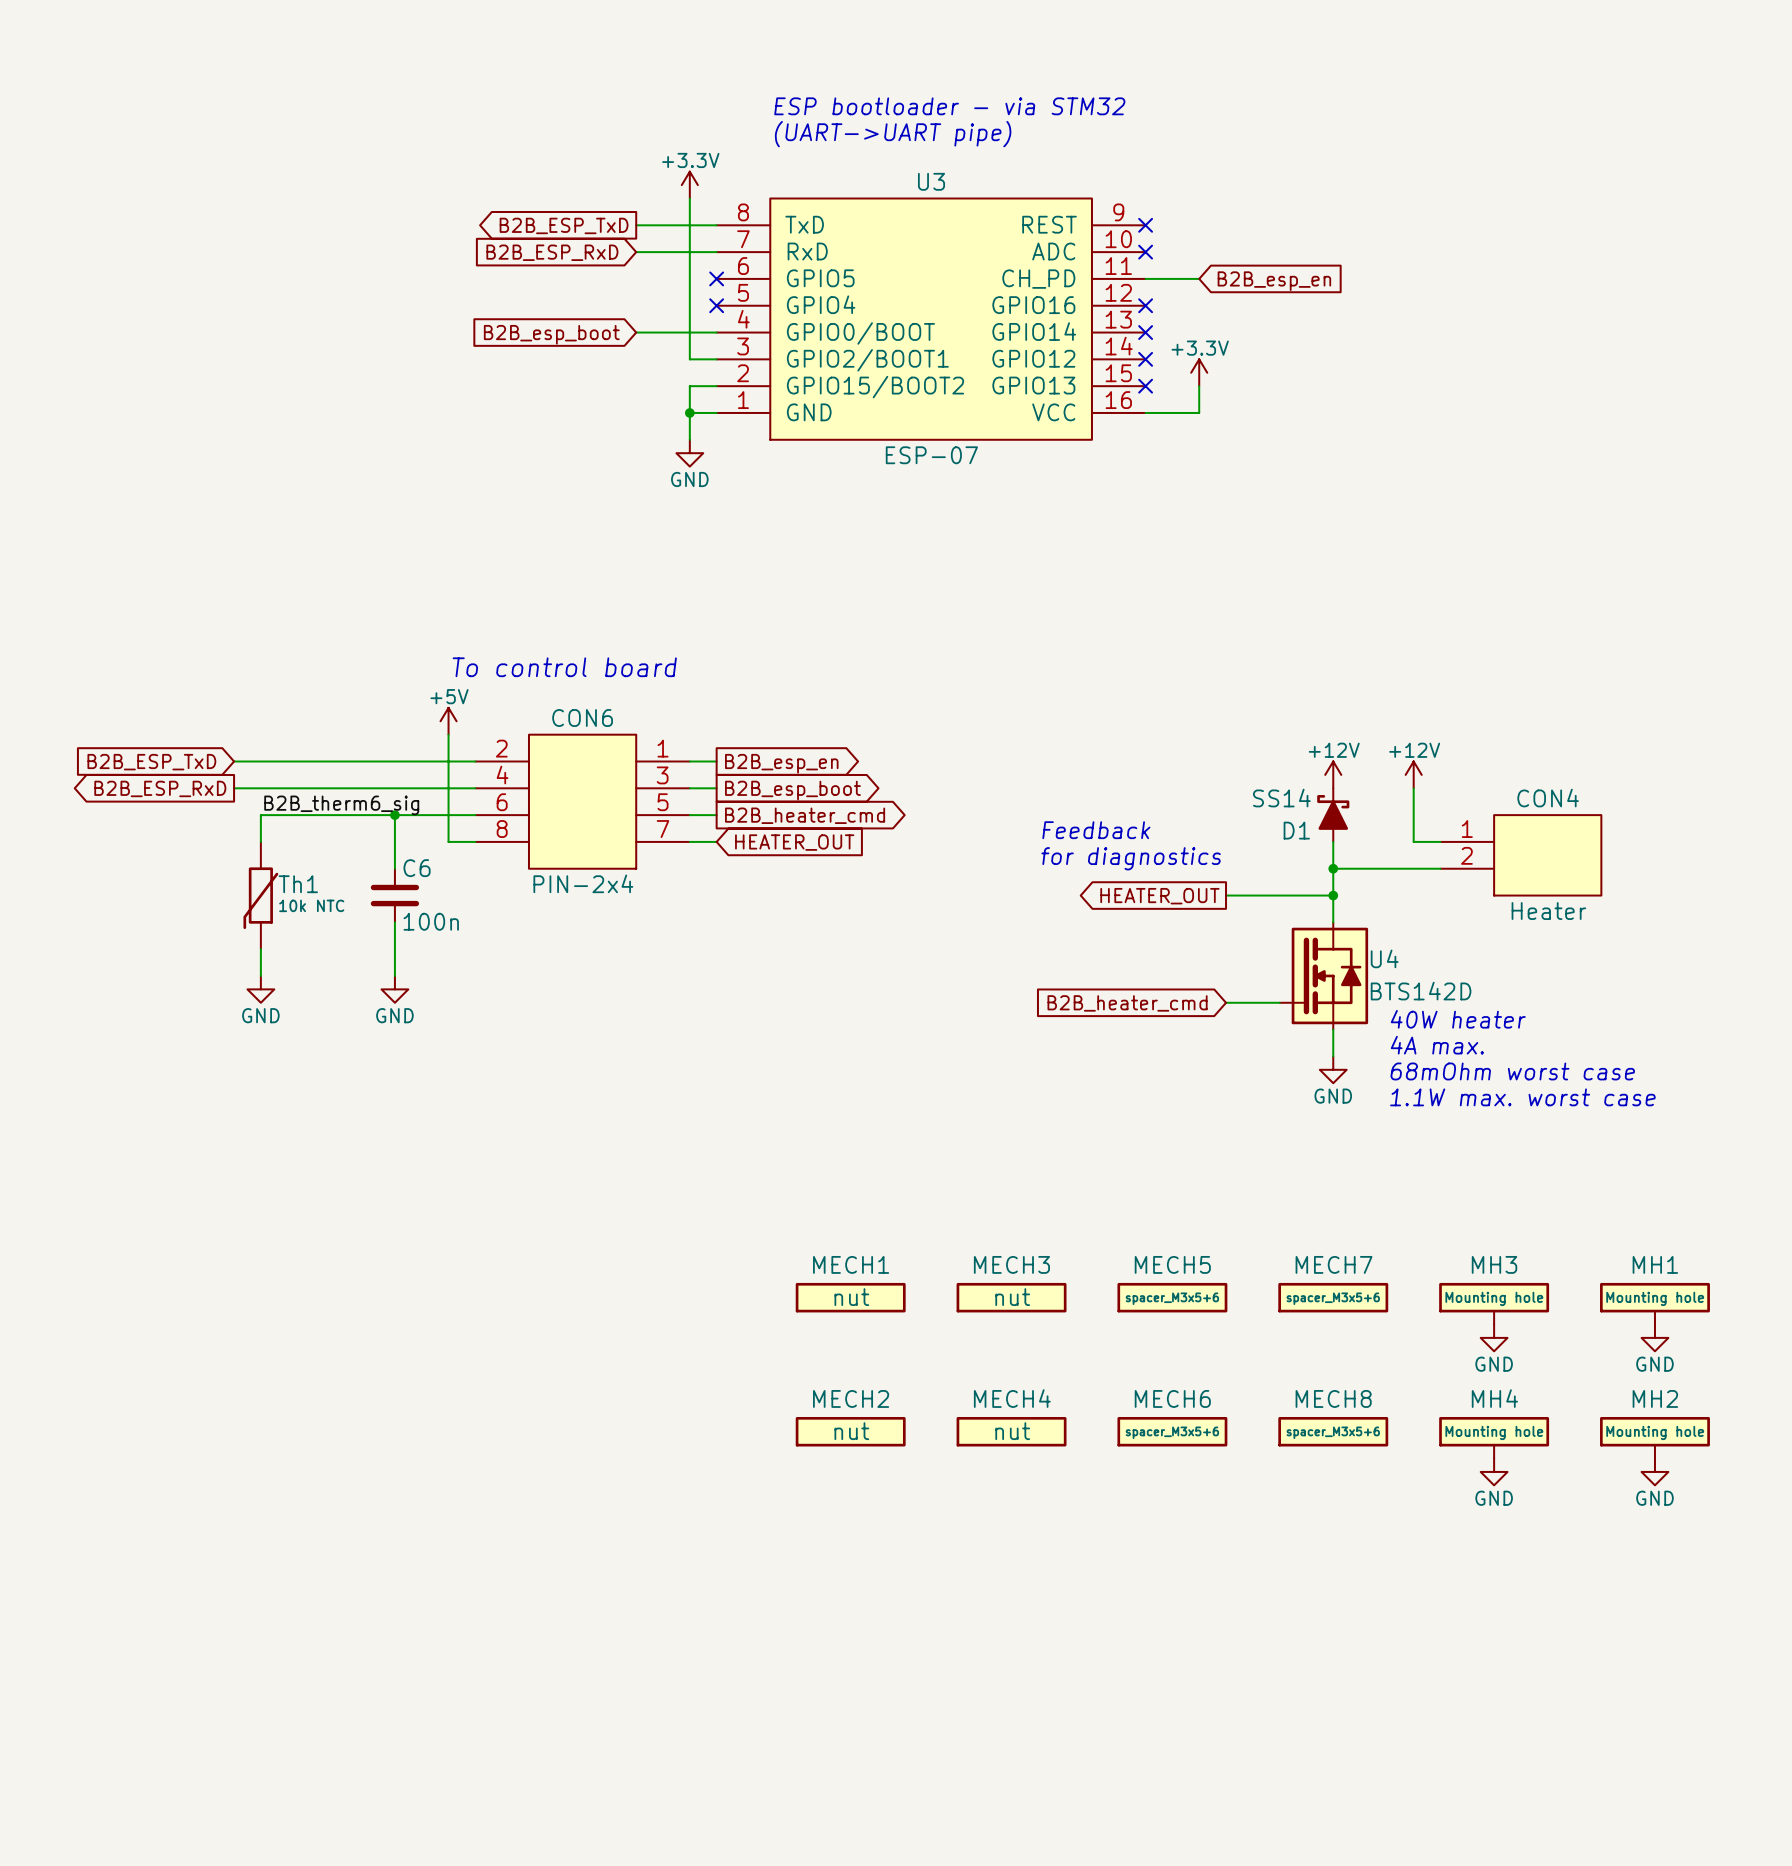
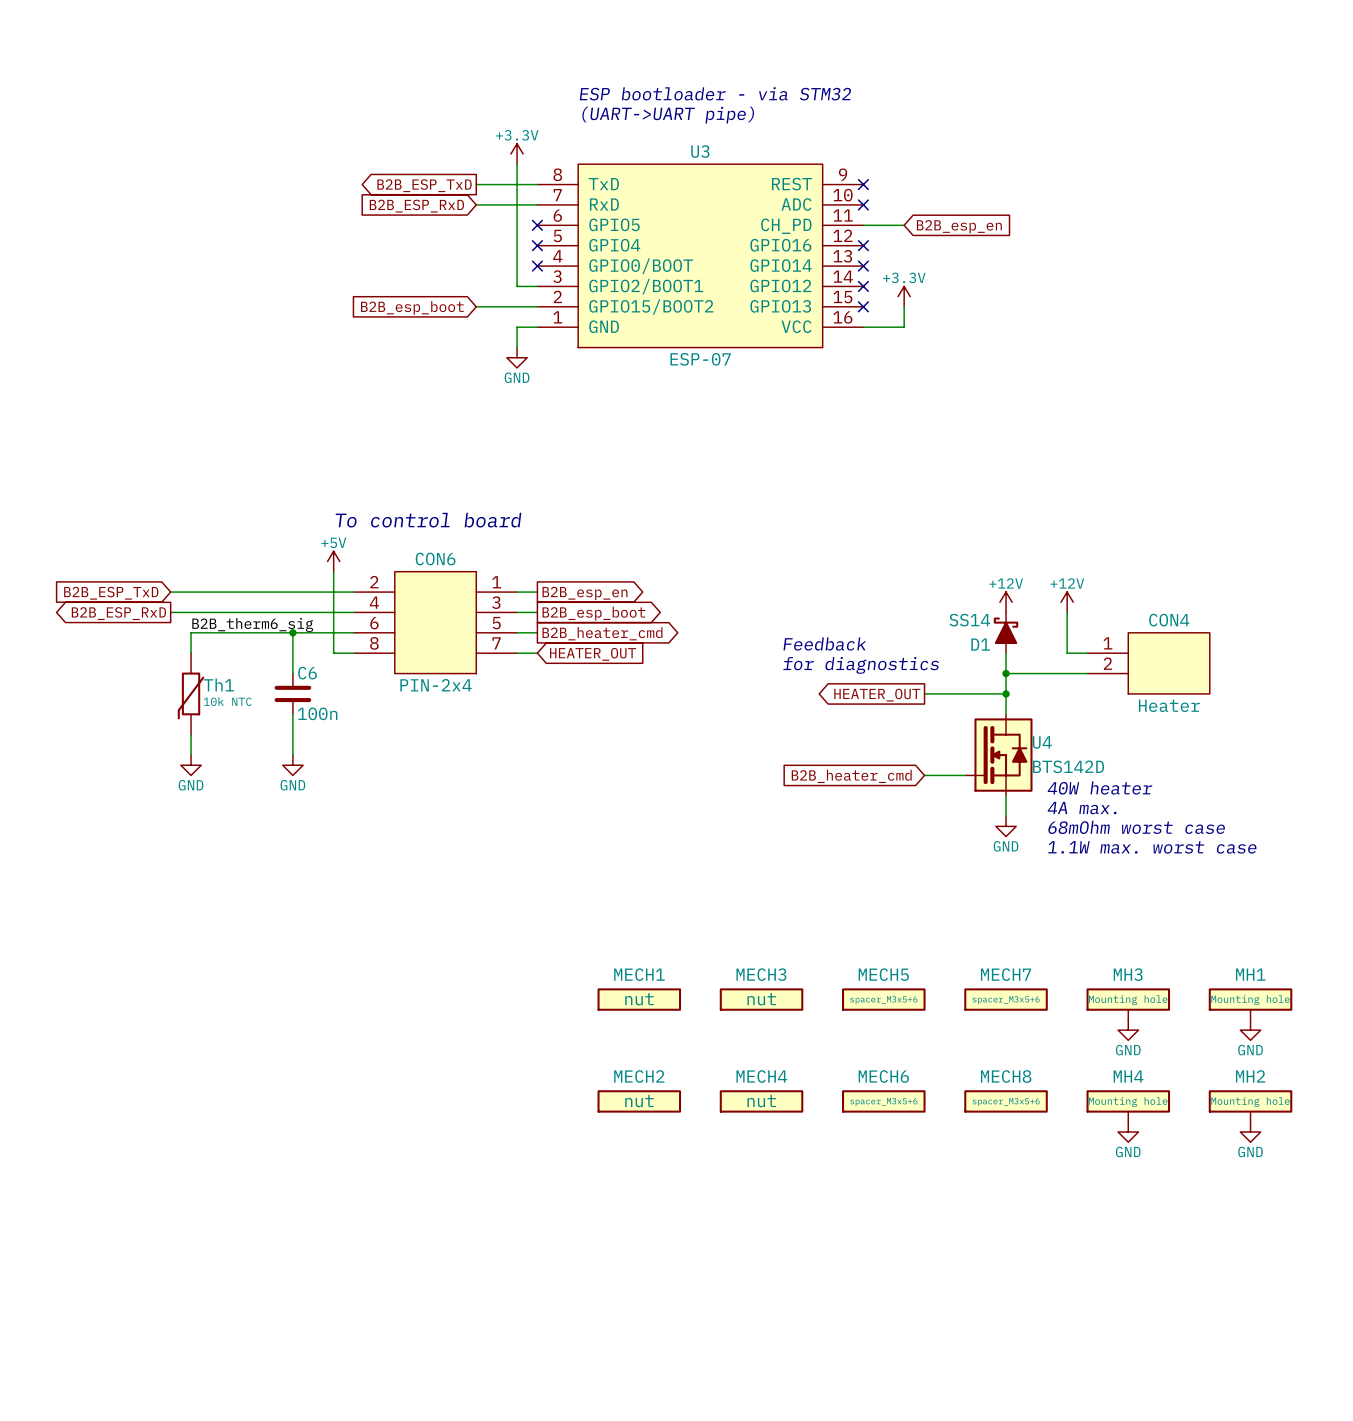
wire: (636, 332) (716, 332) -> none
no-connect mark: none -> (537, 266)
global label position: B2B_esp_boot (551, 334) -> B2B_esp_boot (412, 307)
wire: (689, 386) (689, 412) -> (517, 306) (476, 306)
junction: (689, 412) -> none

